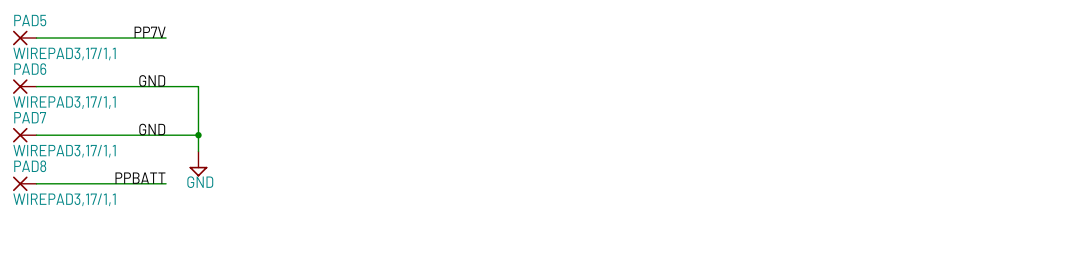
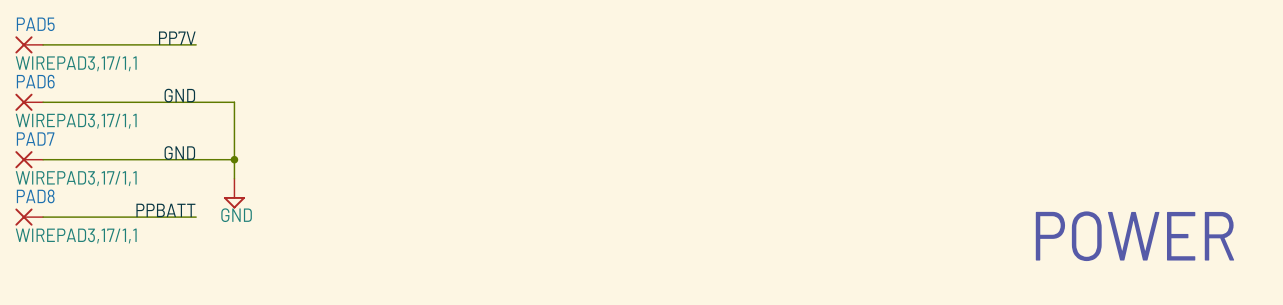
text: none -> POWER (1134, 236)

